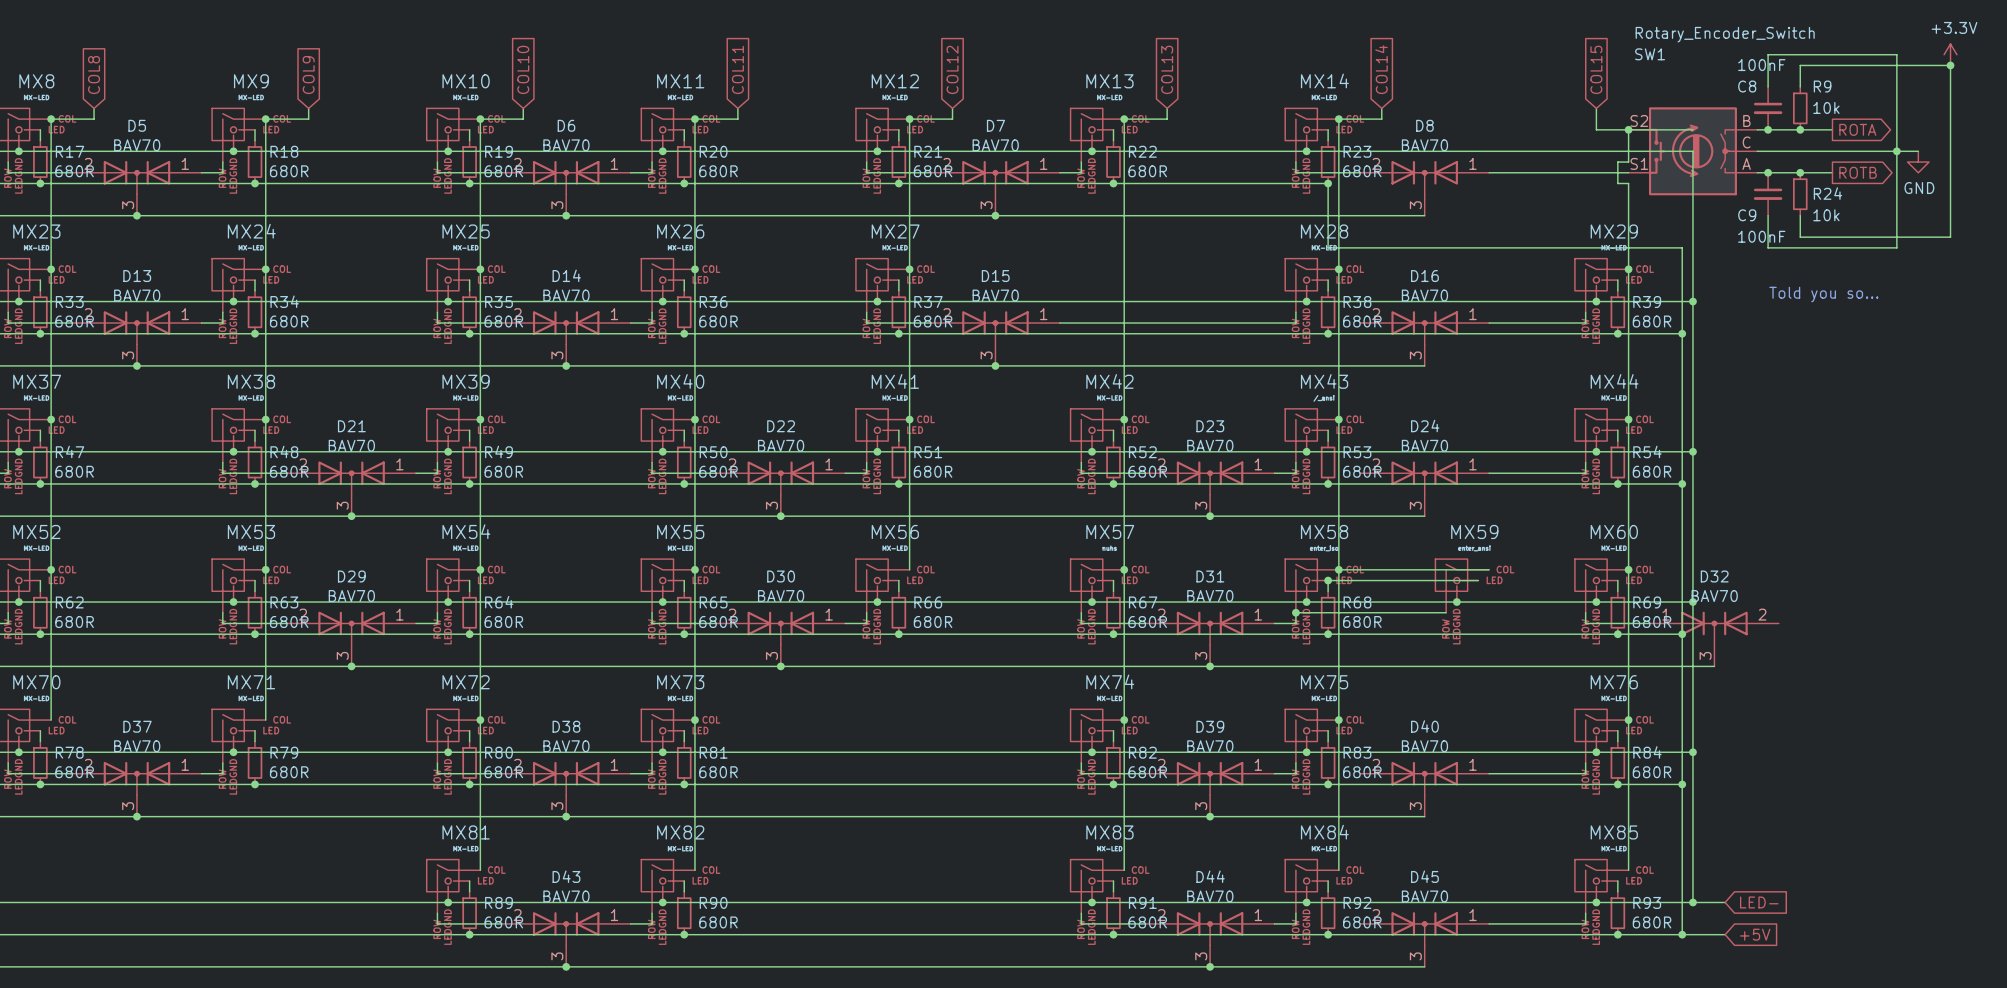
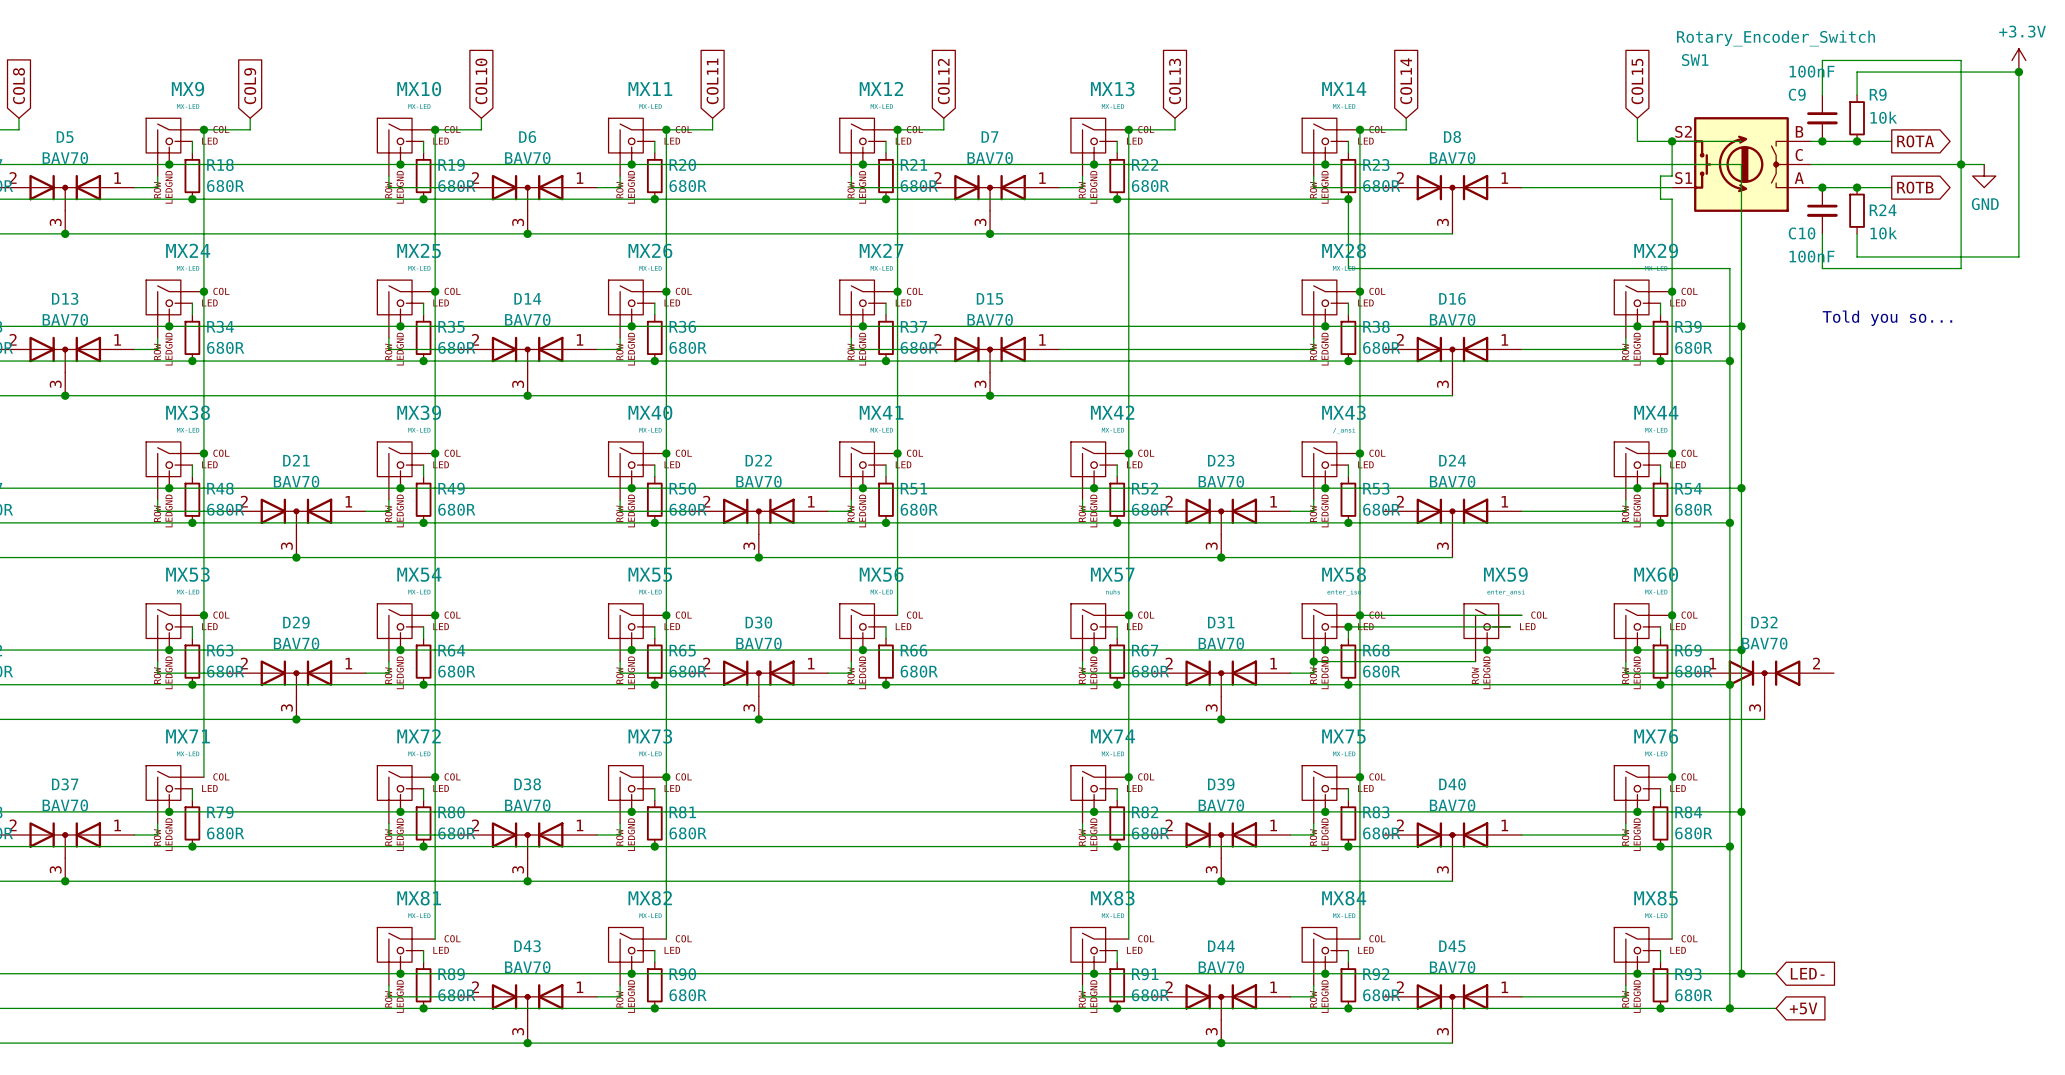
C8 name: C8 (1747, 86) -> C9 (1797, 94)
C9 name: C9 (1747, 215) -> C10 (1802, 233)

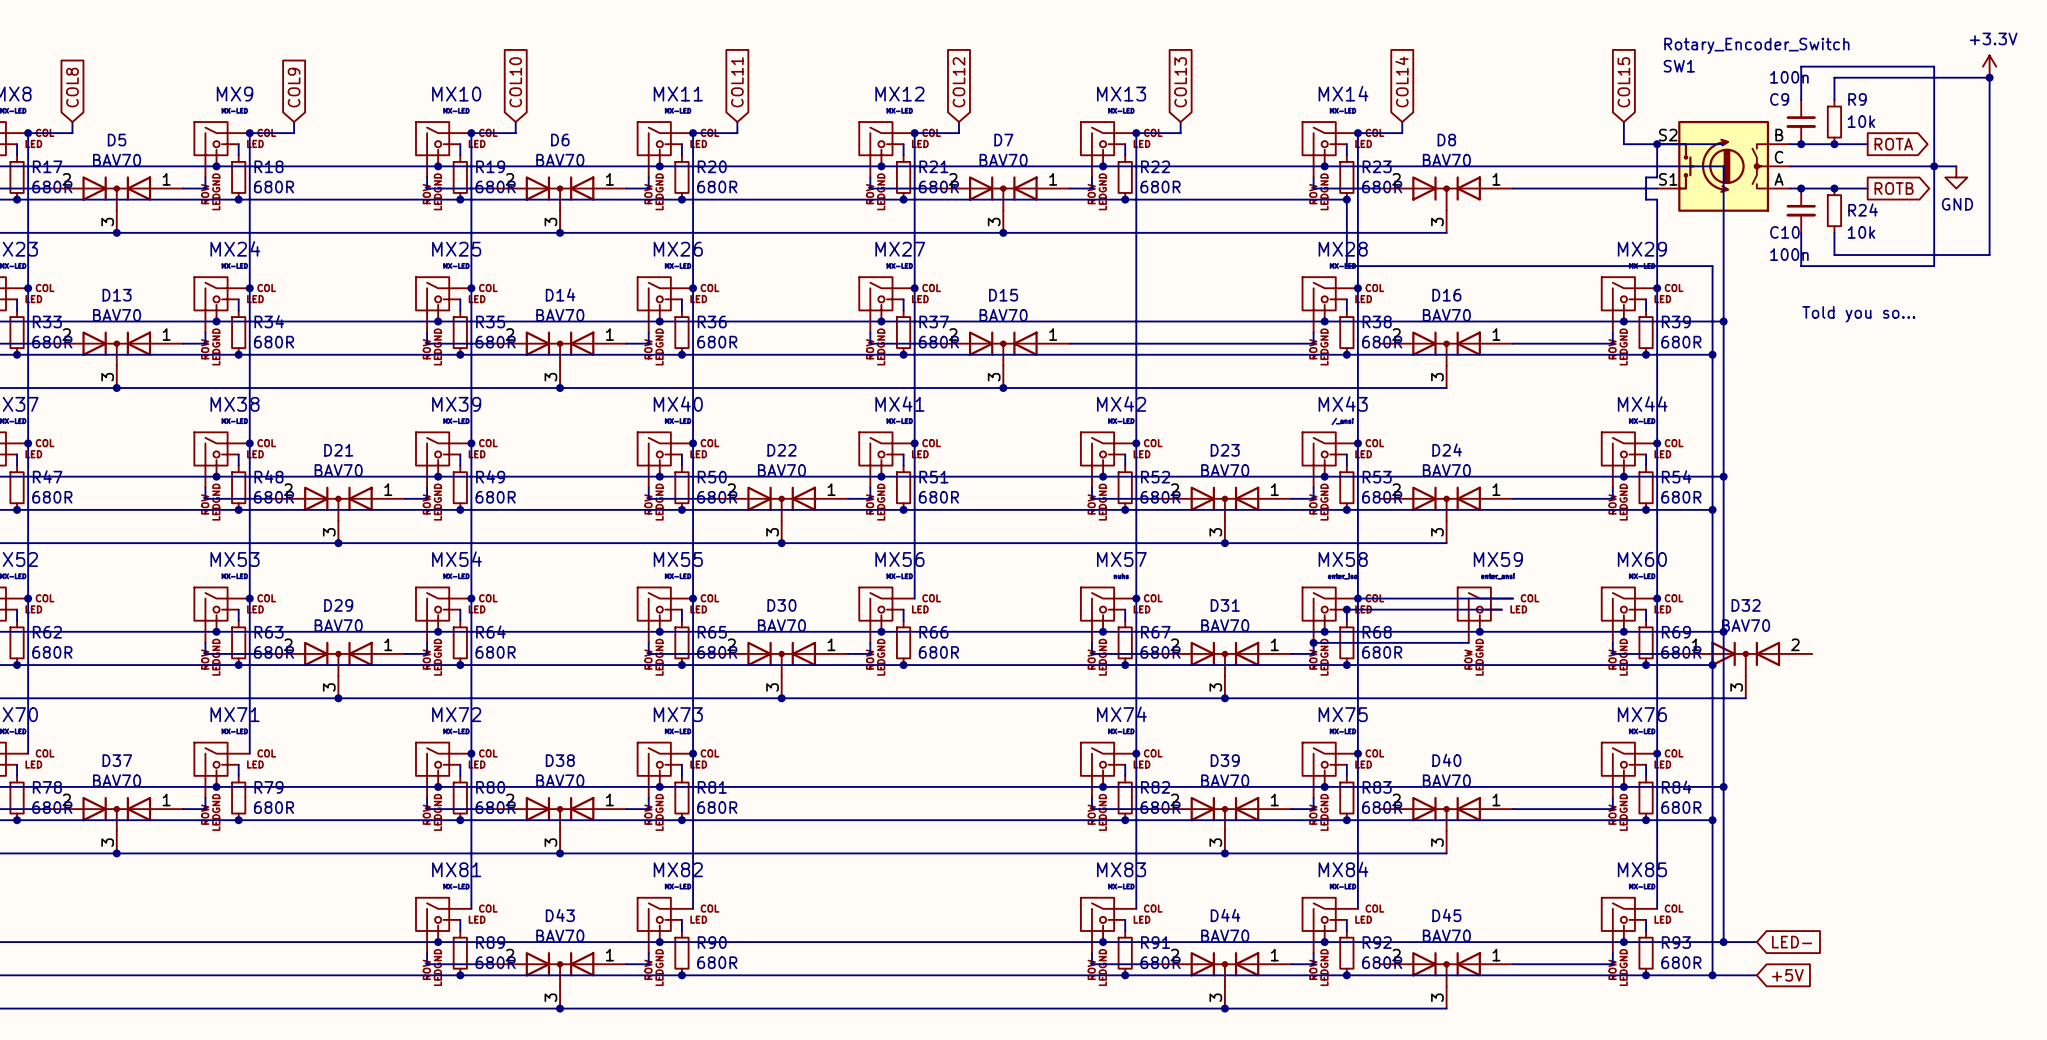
C9 value: 100nF (1812, 71) -> 100n (1789, 77)
C10 value: 100nF (1812, 256) -> 100n (1789, 254)

